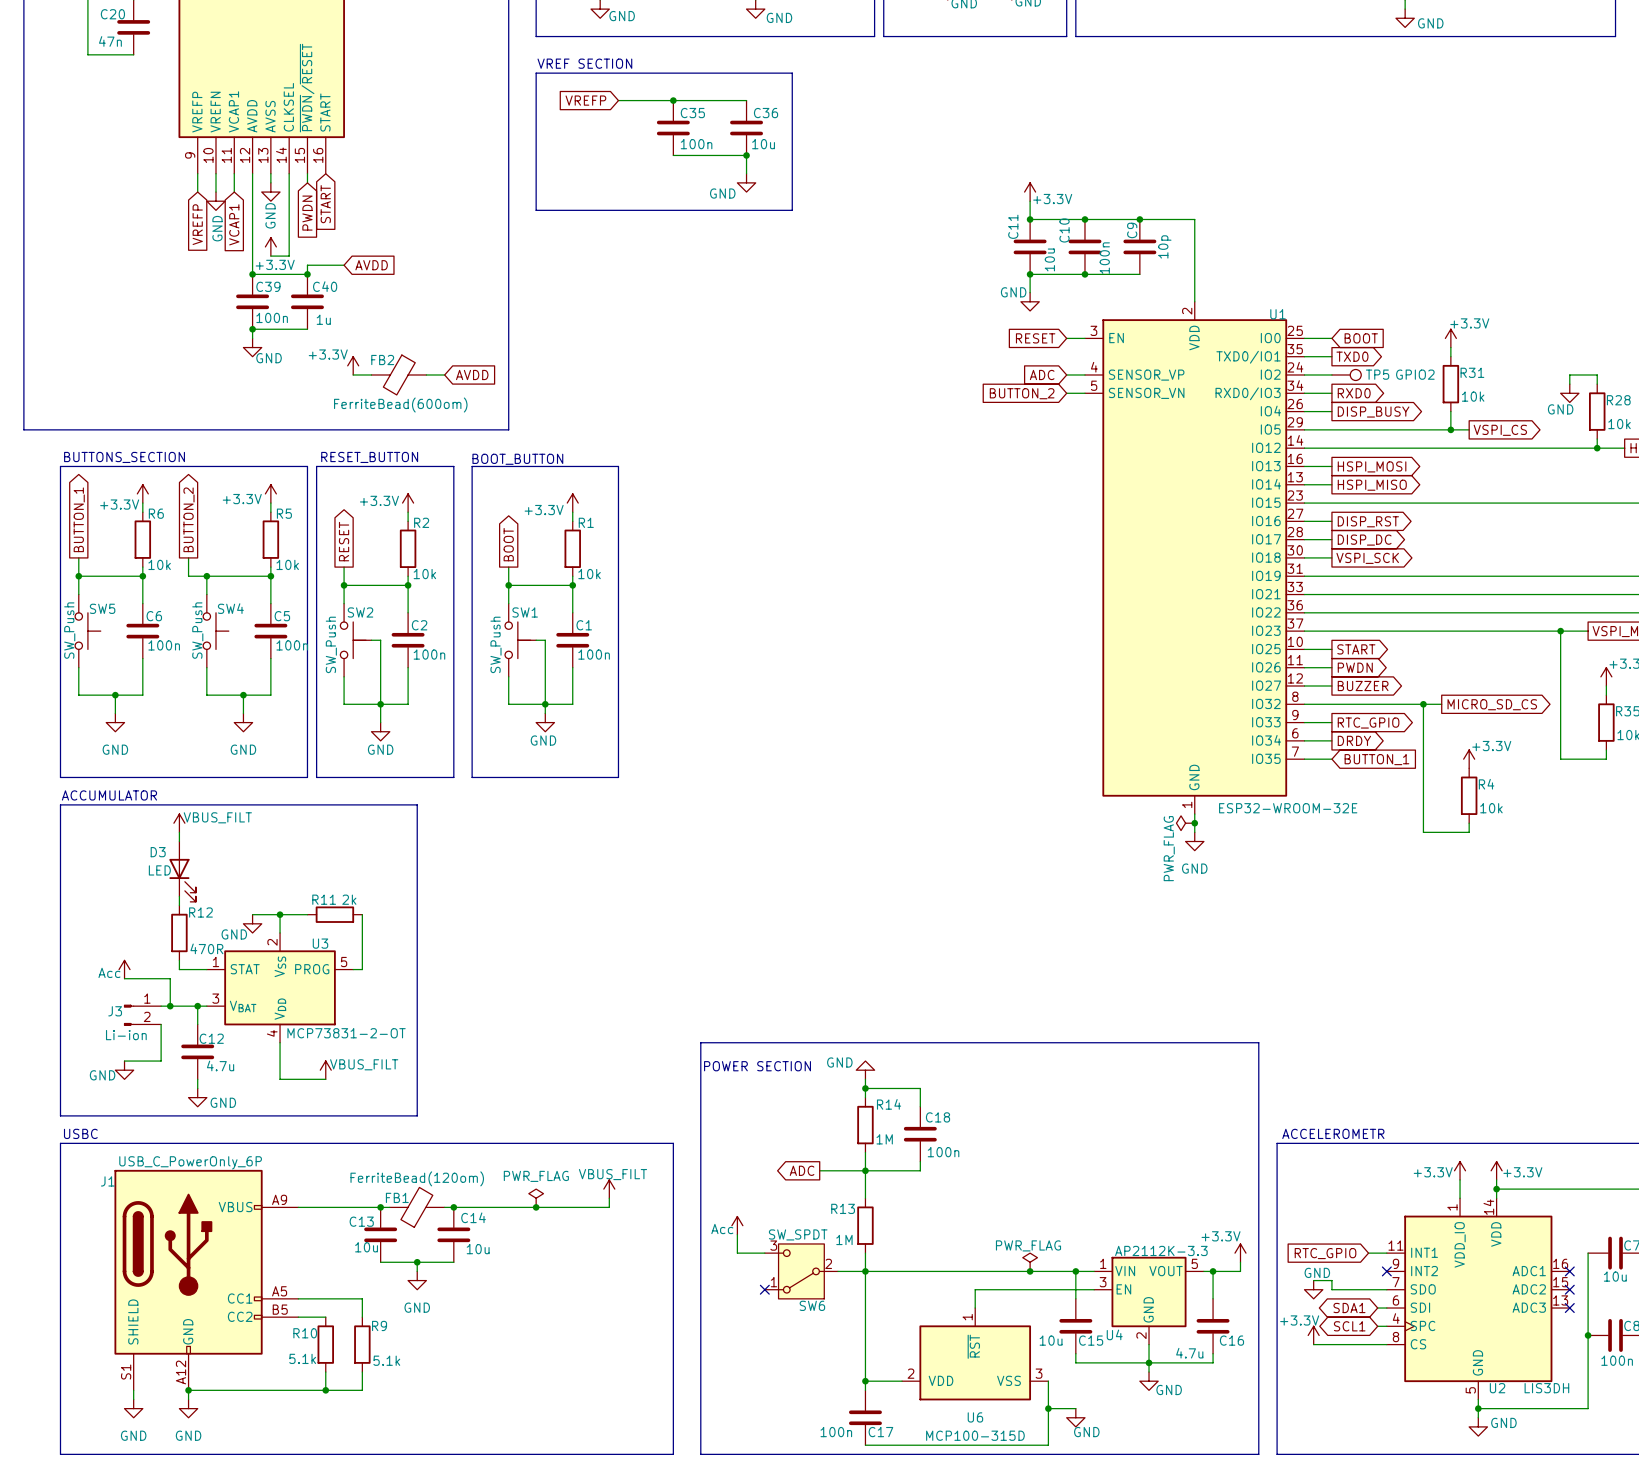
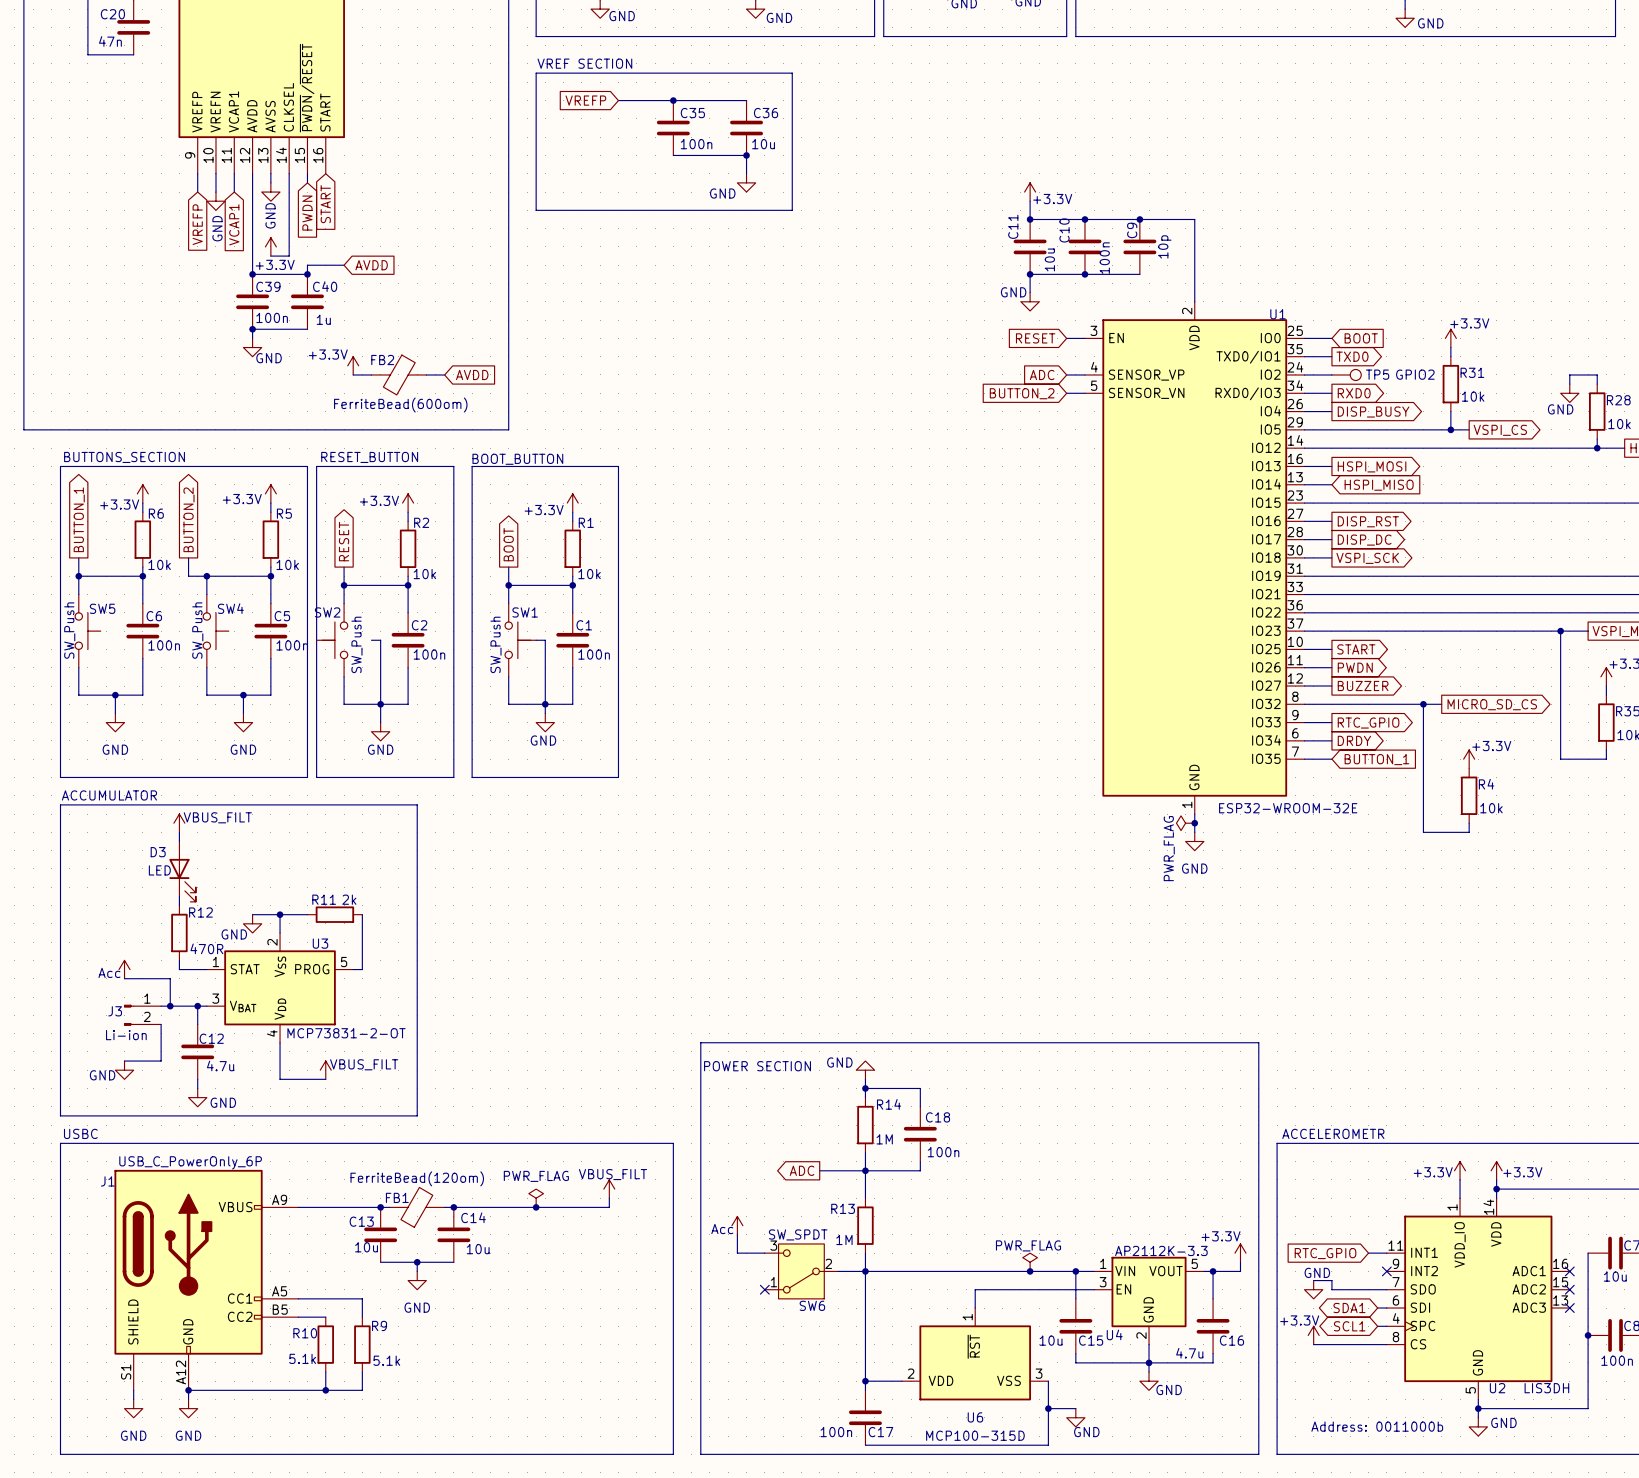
global label shape: output (1372, 485) -> input (1379, 485)
SW2 rotation: 0° (353, 640) -> 180° (334, 640)
text: none -> Address: 0011000b (1377, 1426)

